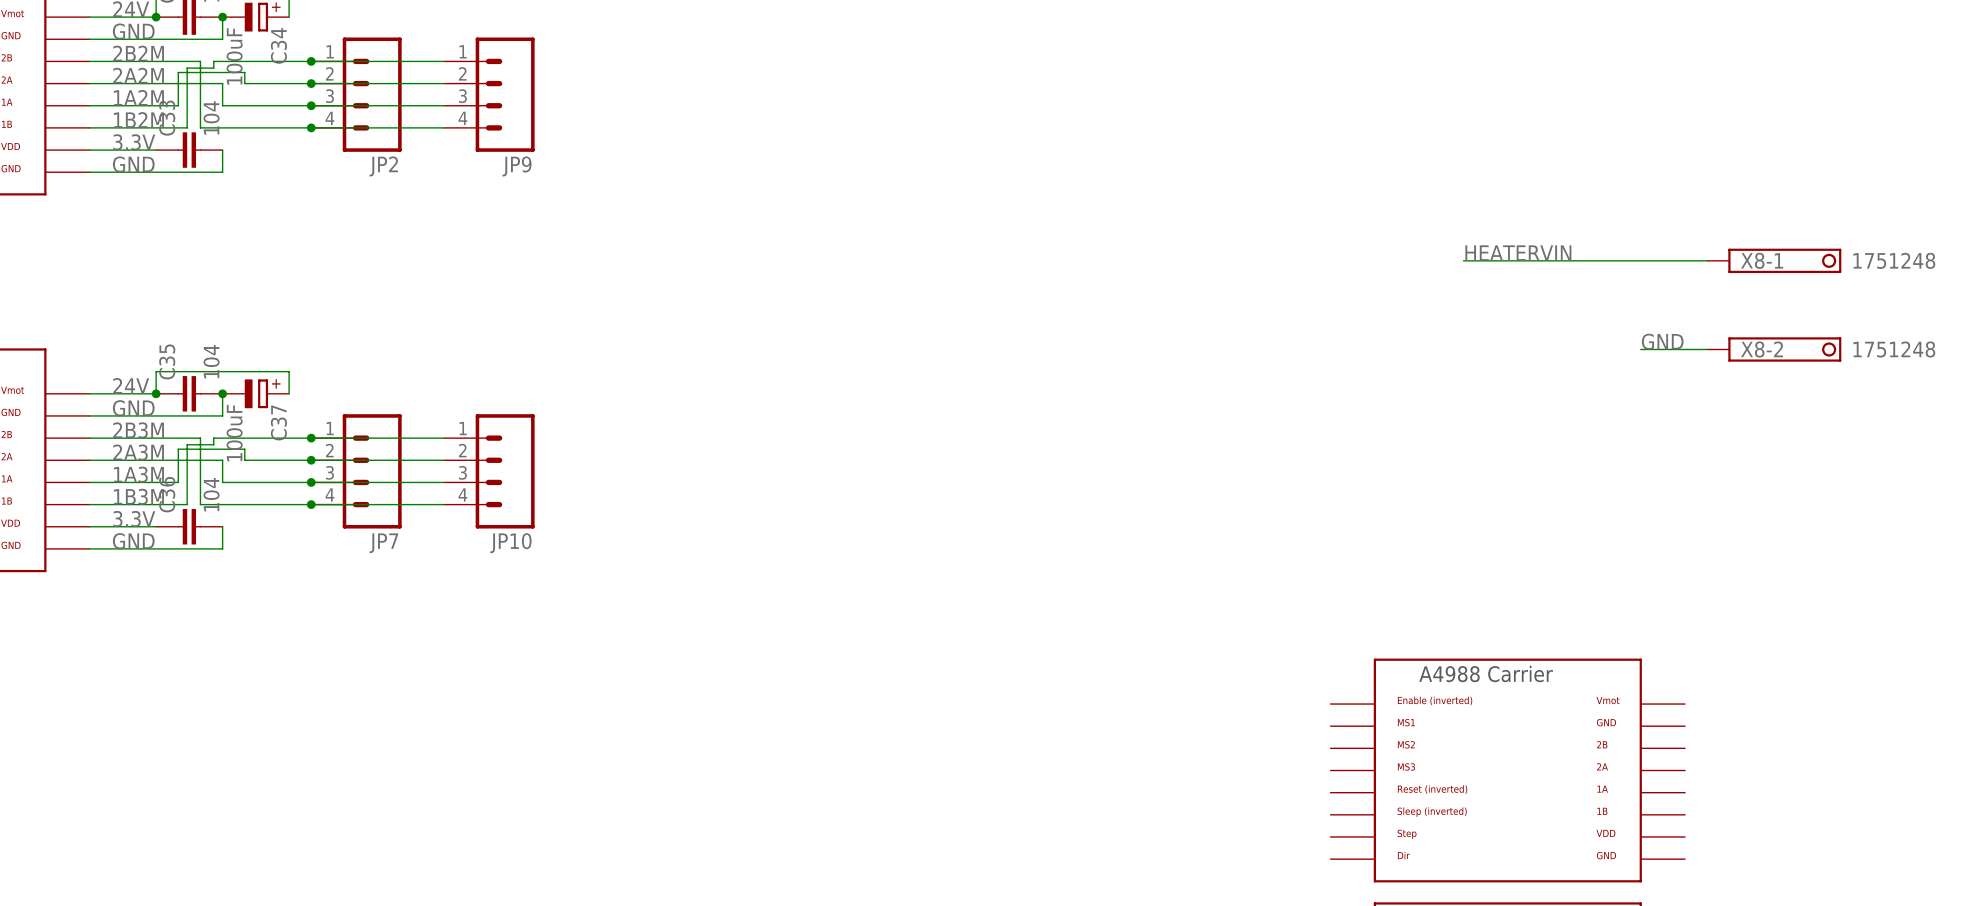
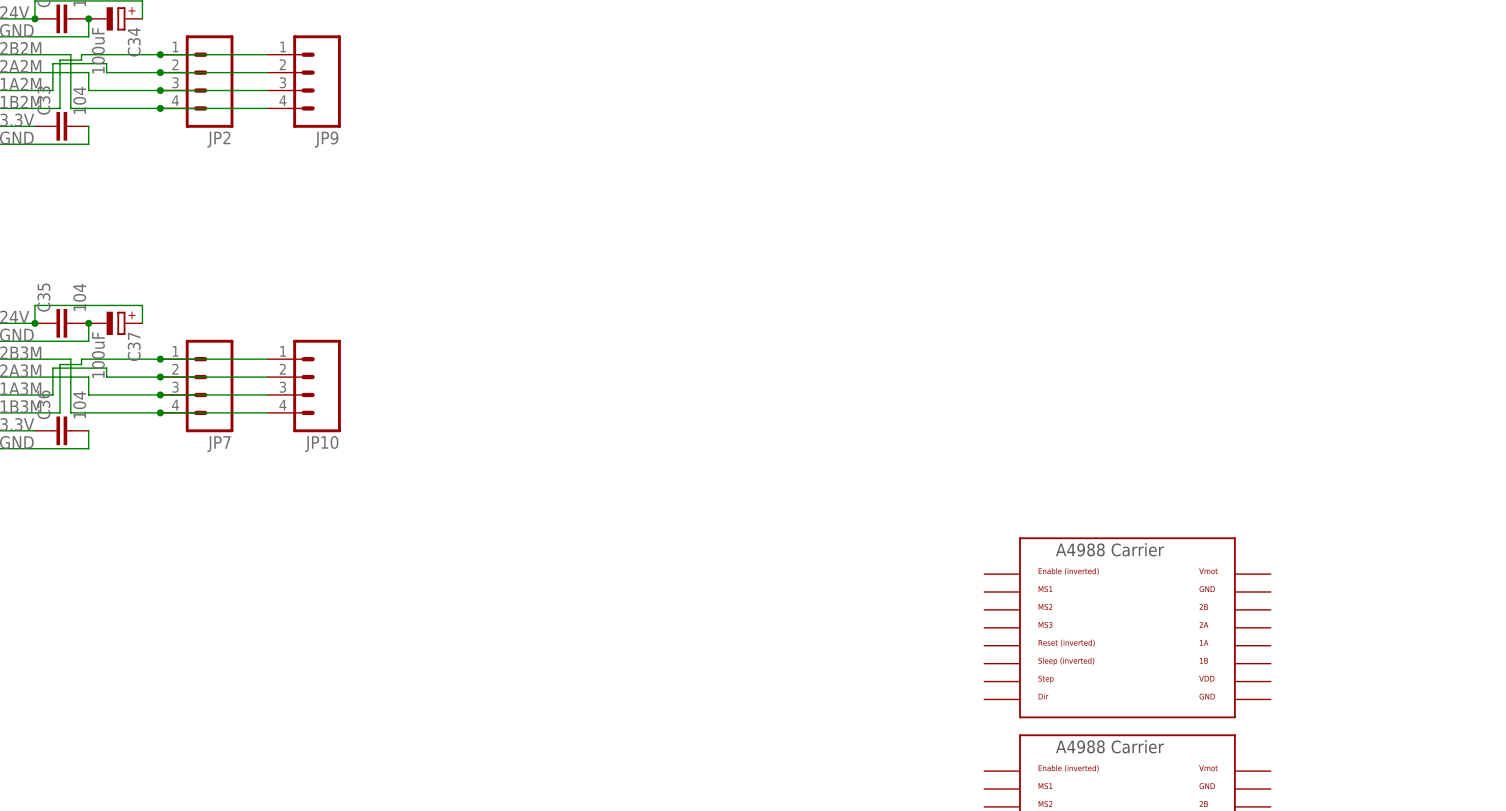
label: HEATERVIN (1518, 253) -> none
wire: (1463, 260) (1707, 260) -> none
X8-1: 1751248 (1774, 260) -> none
label: GND (1662, 341) -> none
wire: (1640, 349) (1707, 349) -> none
X8-2: 1751248 (1774, 349) -> none

